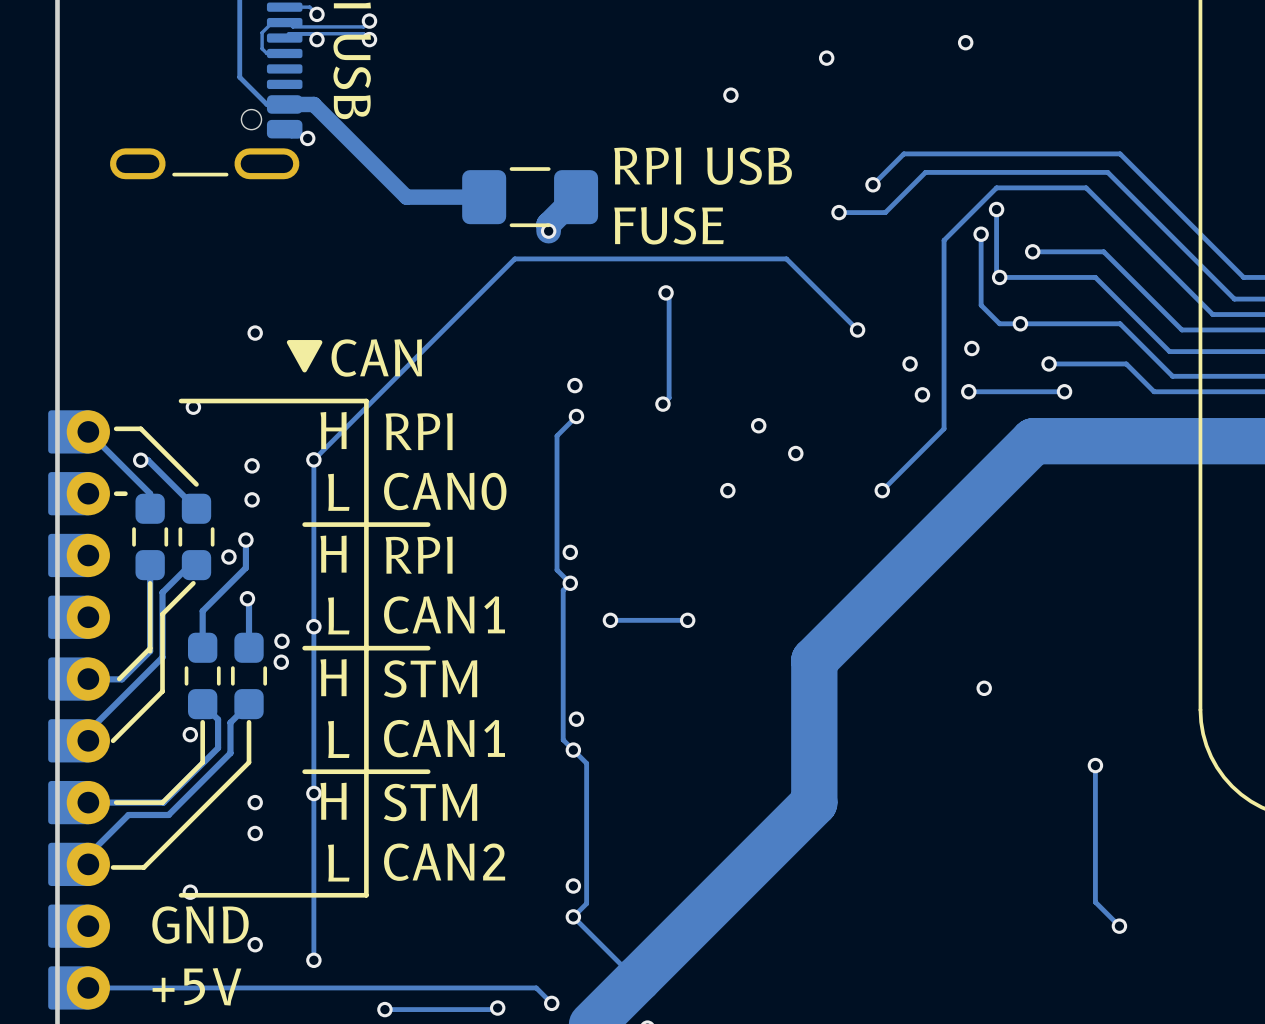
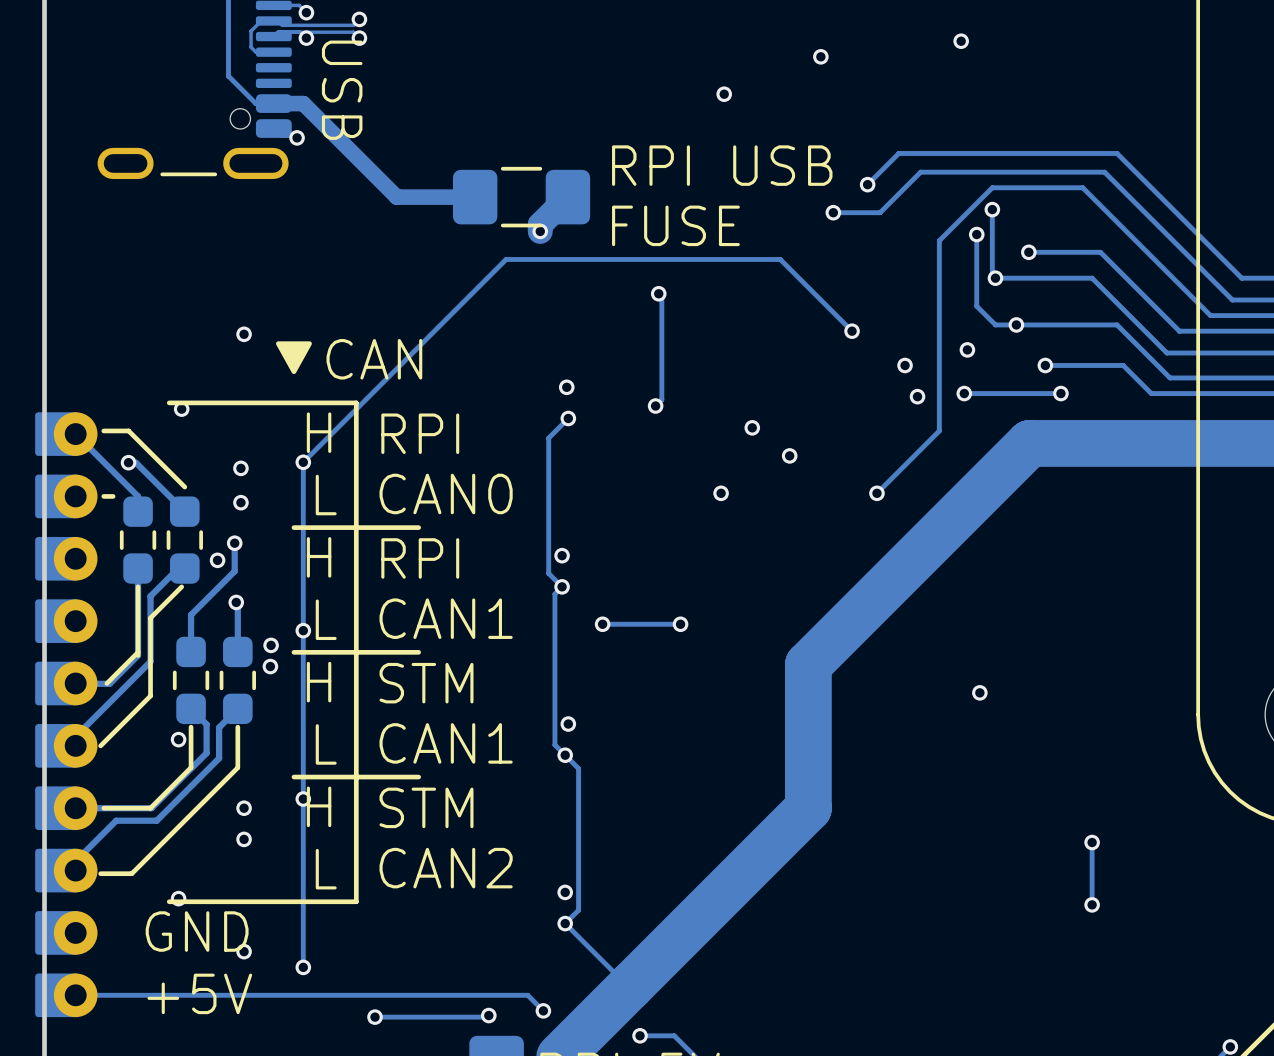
track: (1095, 765) (1095, 836) -> none
via: (1095, 765) -> none
via: none -> (1092, 842)
track: (1095, 898) (1095, 902) (1119, 926) -> none
via position: (1119, 926) -> (1092, 904)

